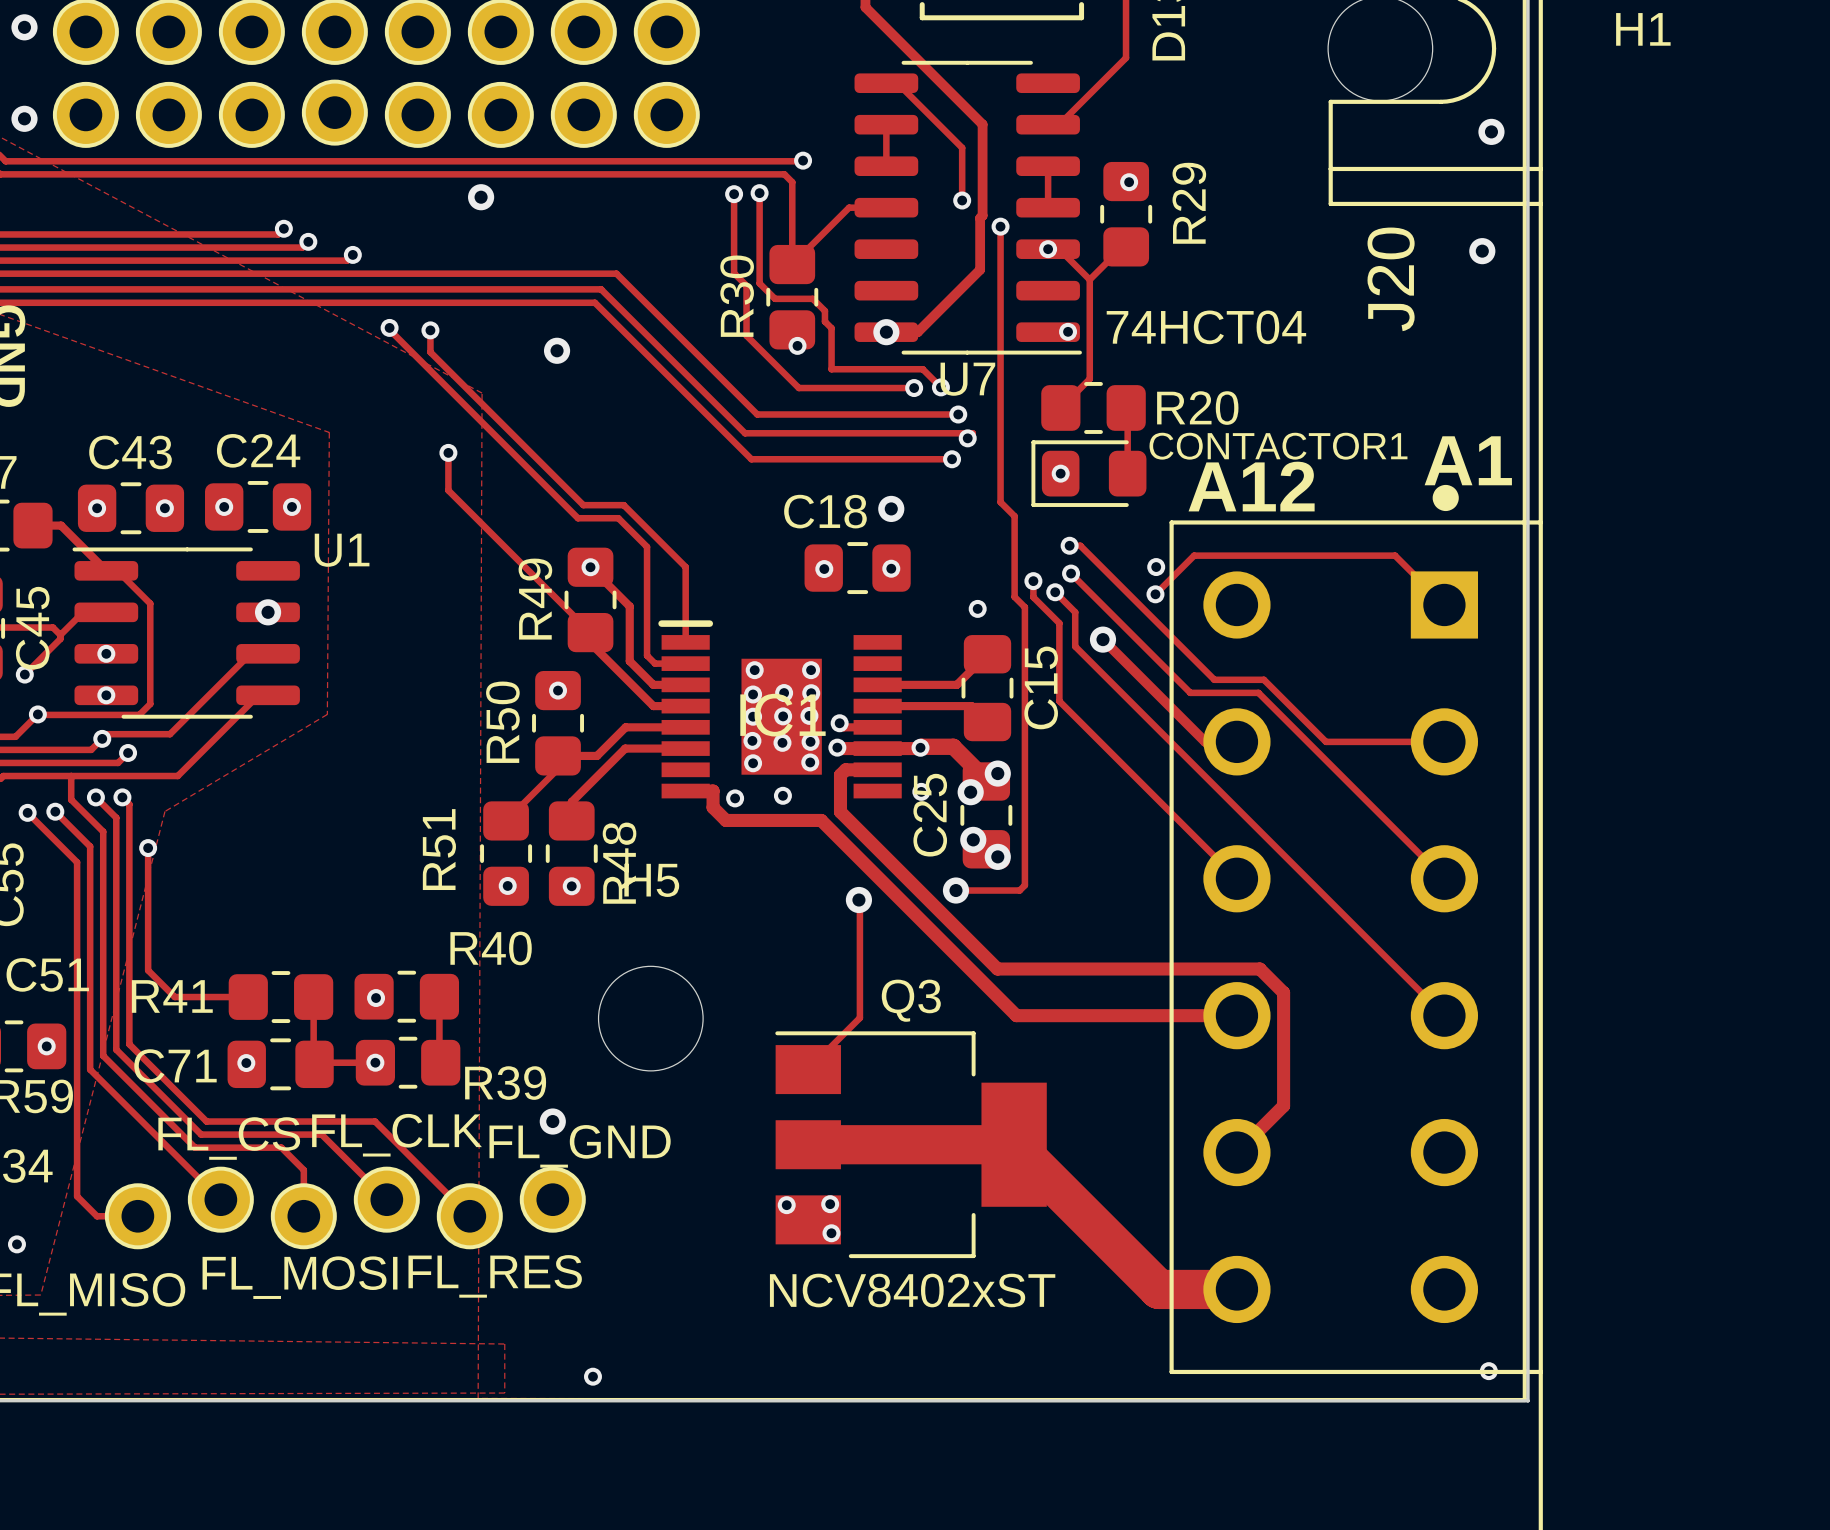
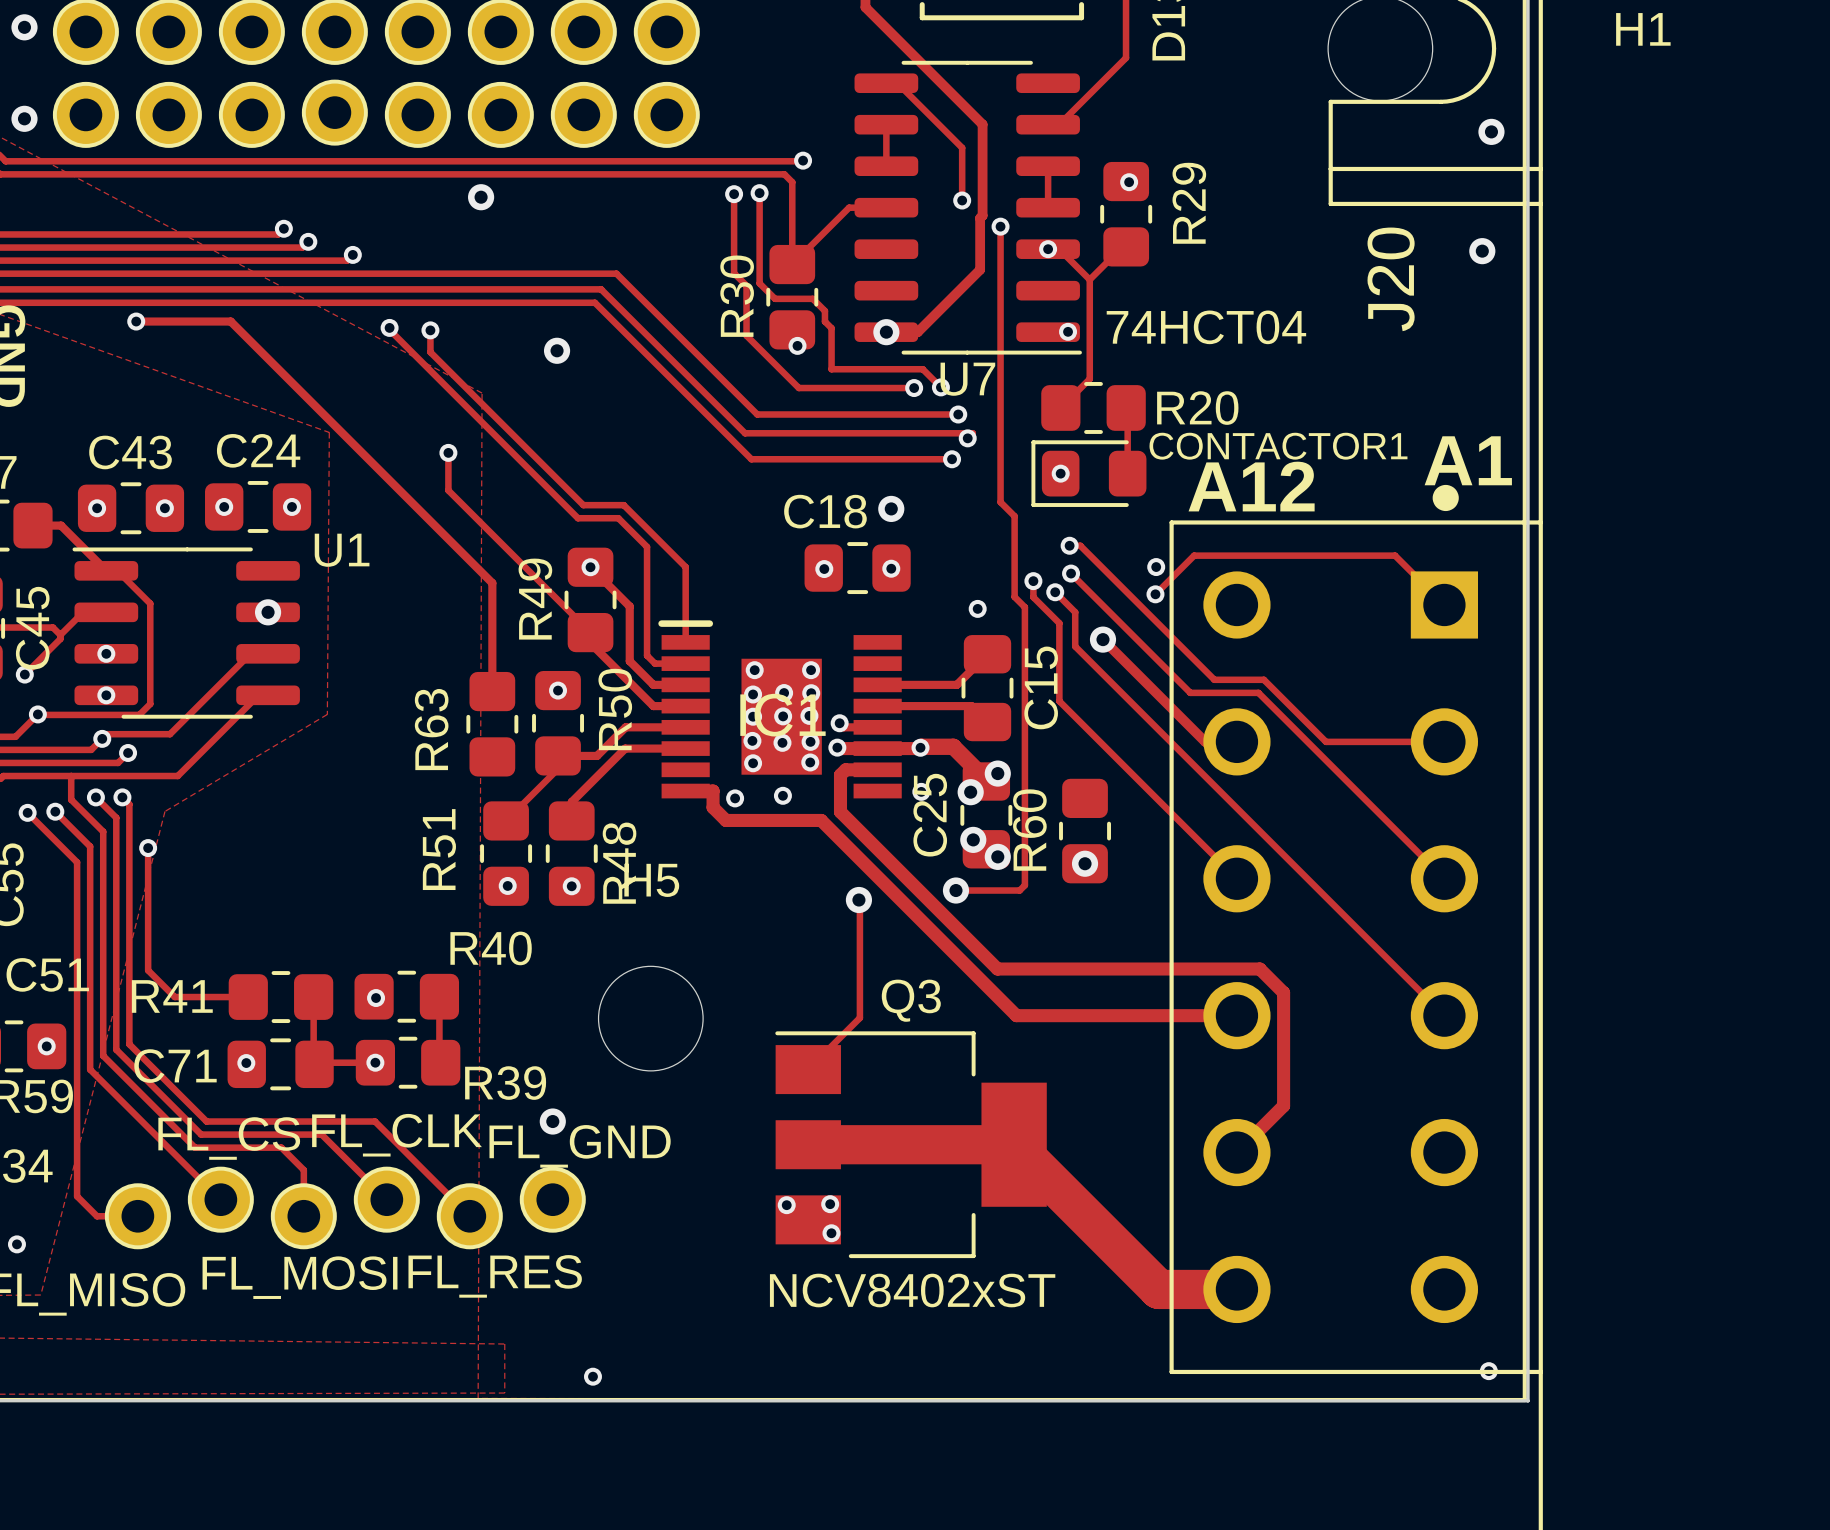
track: none -> (136, 321) (230, 321) (492, 583) (492, 691)
via: none -> (136, 321)
R50 name position: R50 (502, 722) -> R50 (615, 709)
R63: none -> (492, 724)
R60: none -> (1085, 831)
via: none -> (1085, 863)

